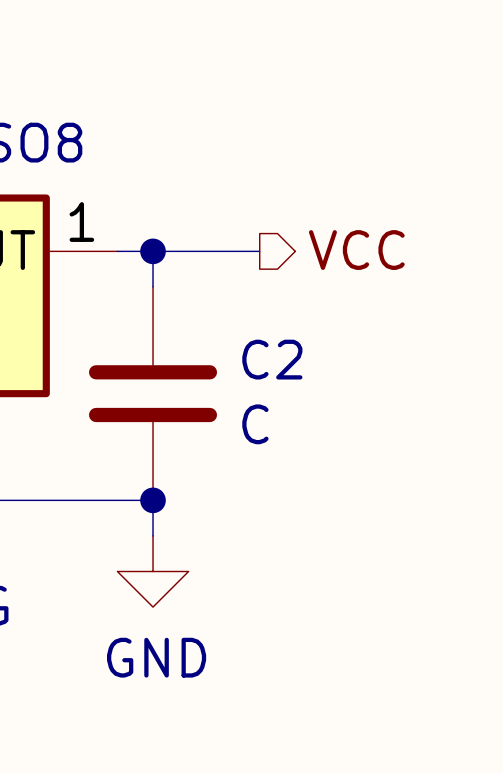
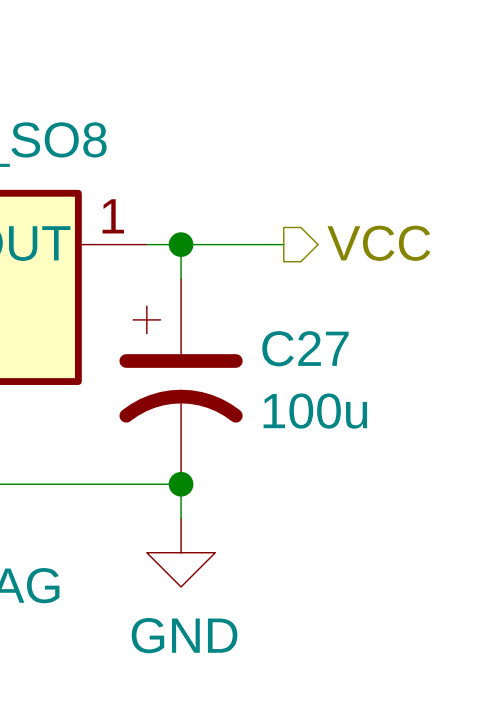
C2: C (153, 393) -> none
C27: none -> 100u (181, 381)

